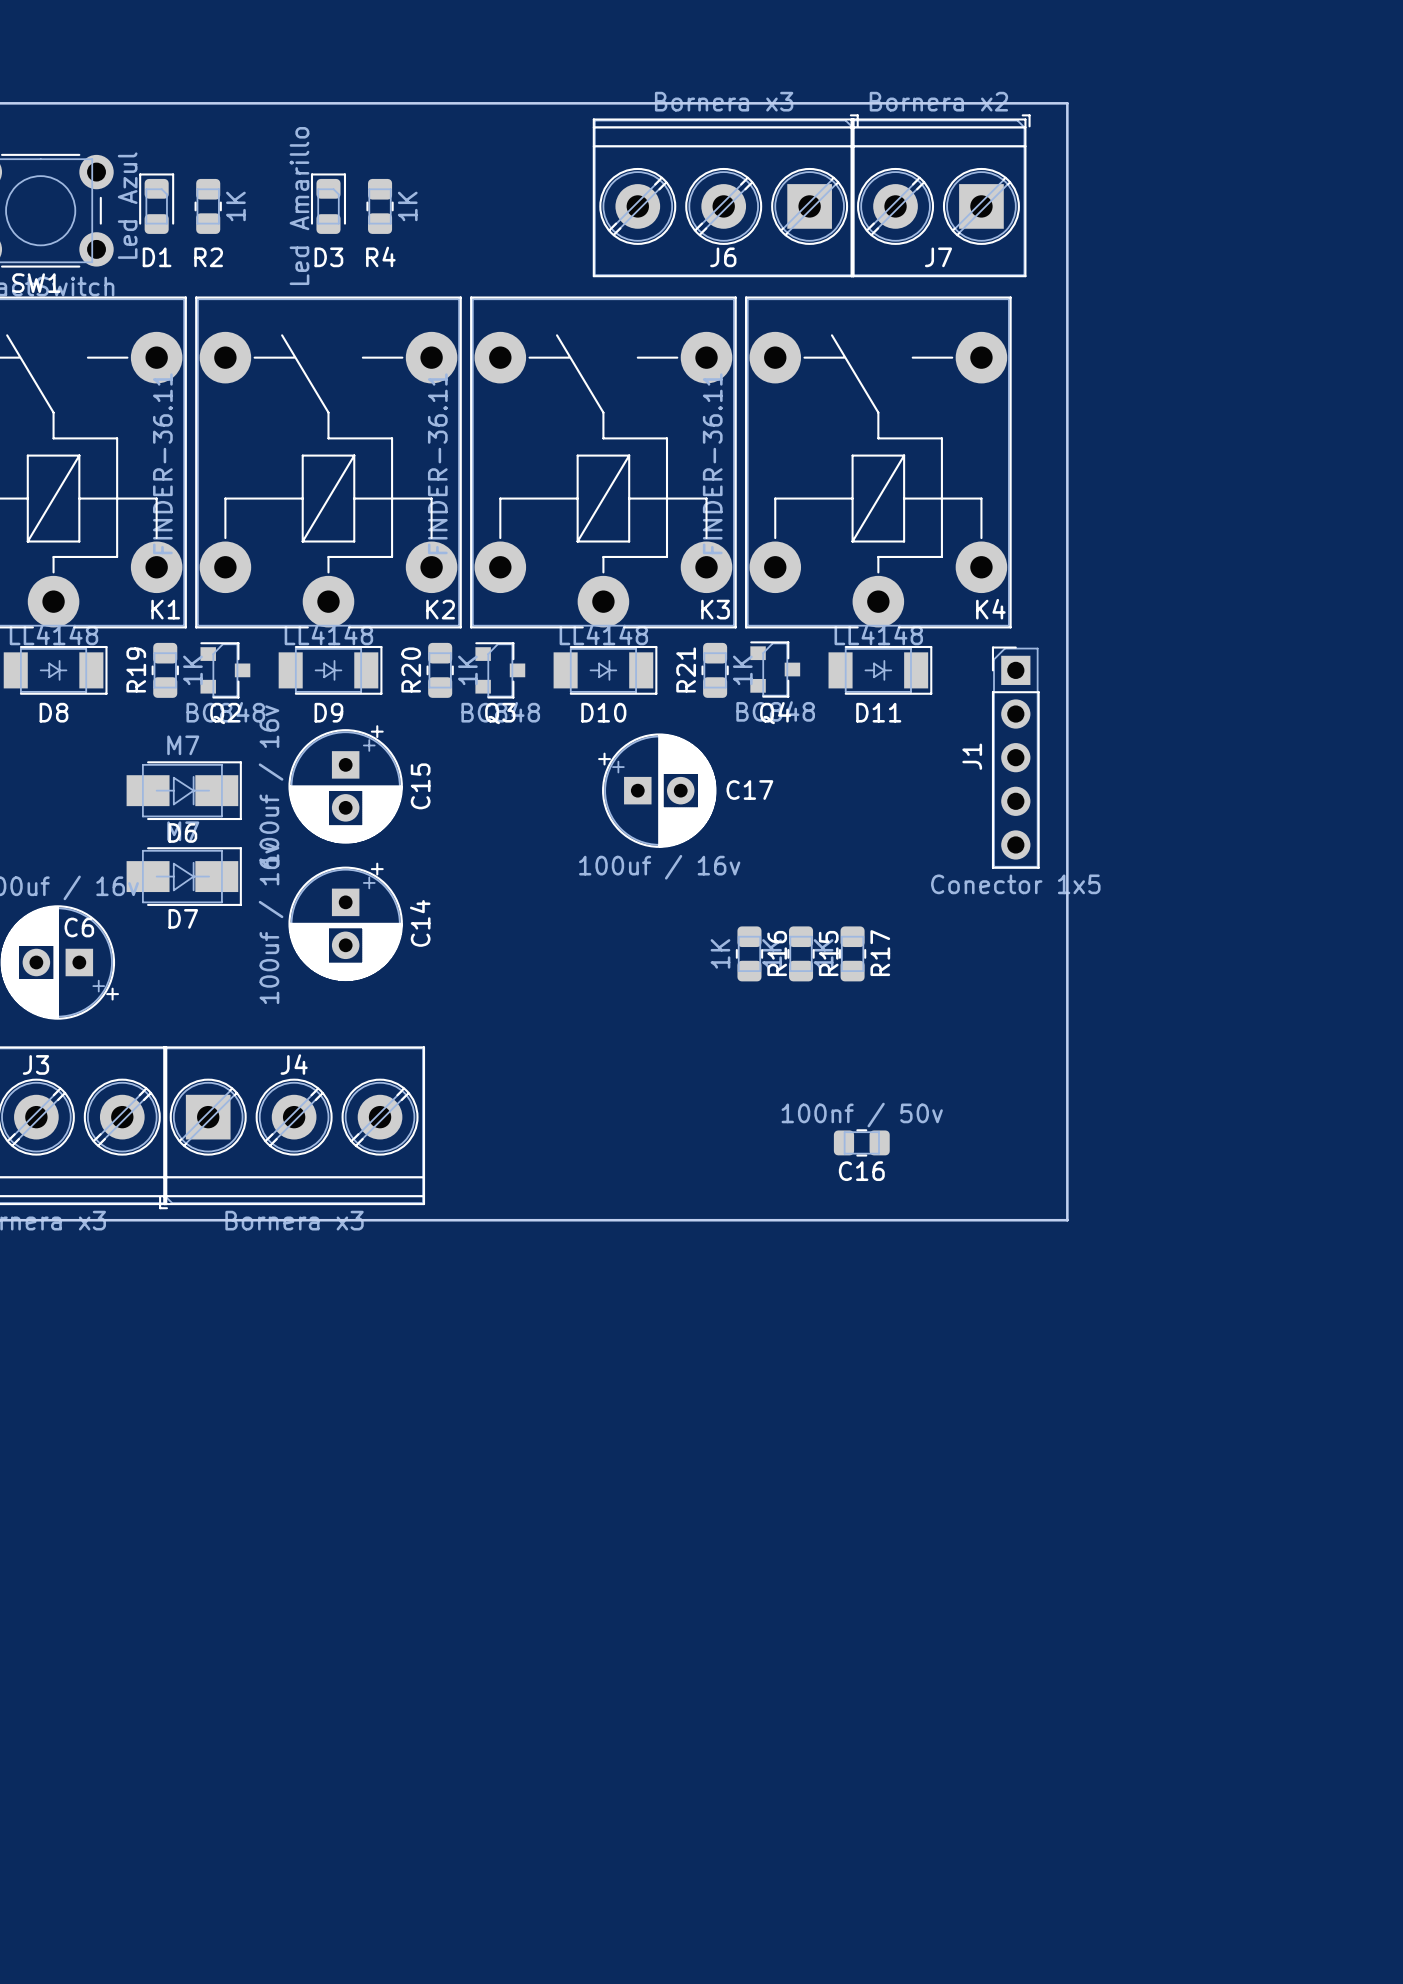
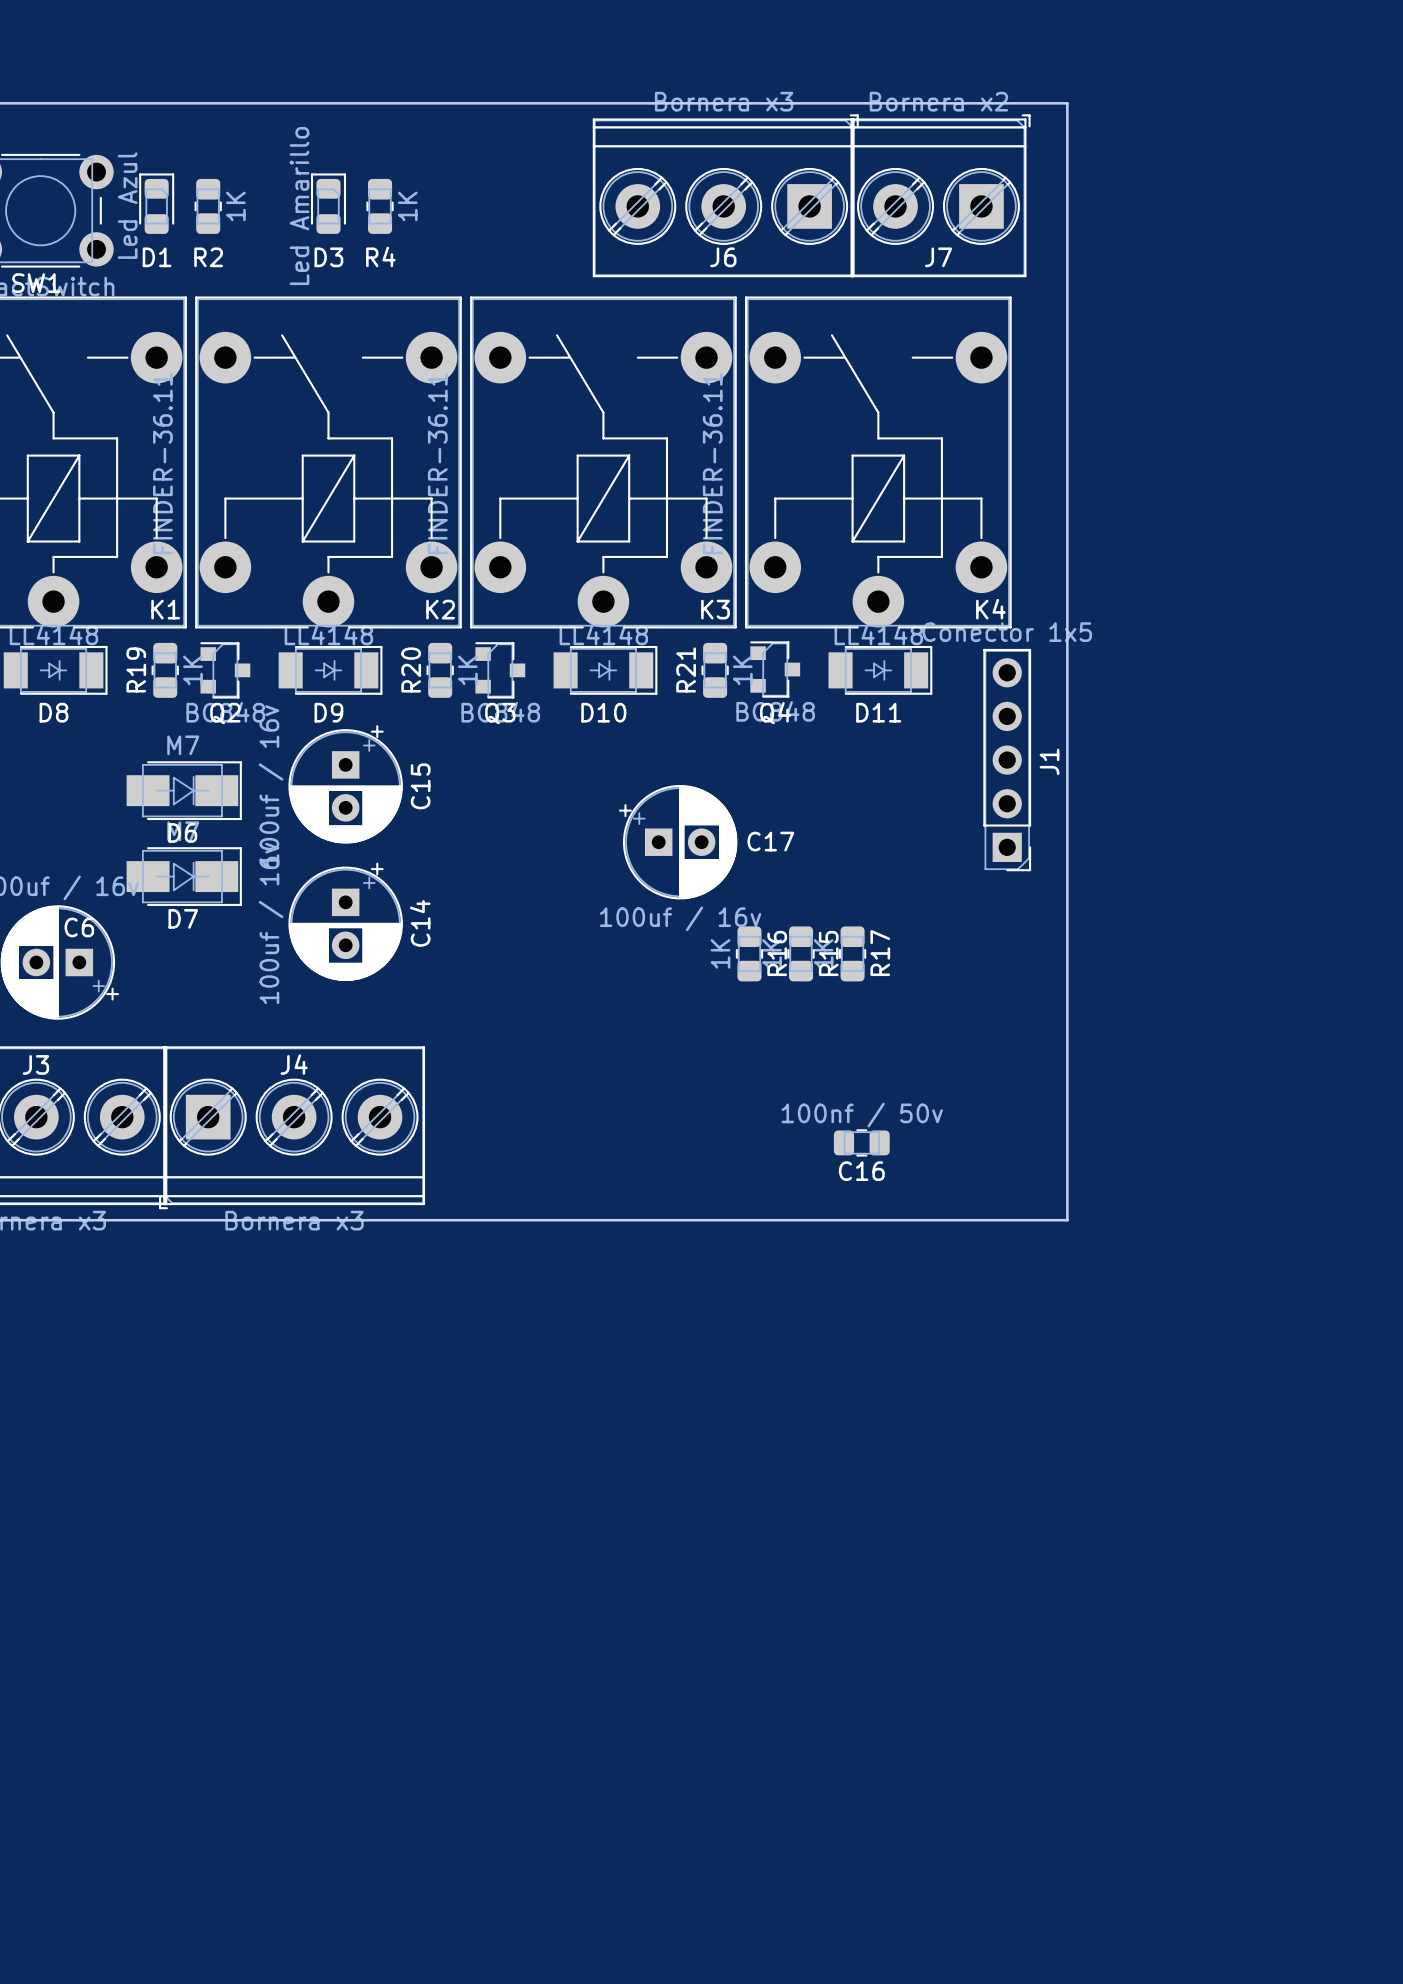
J1 rotation: 0° (1015, 757) -> 180° (1007, 760)
C17 position: (657, 790) -> (678, 842)

